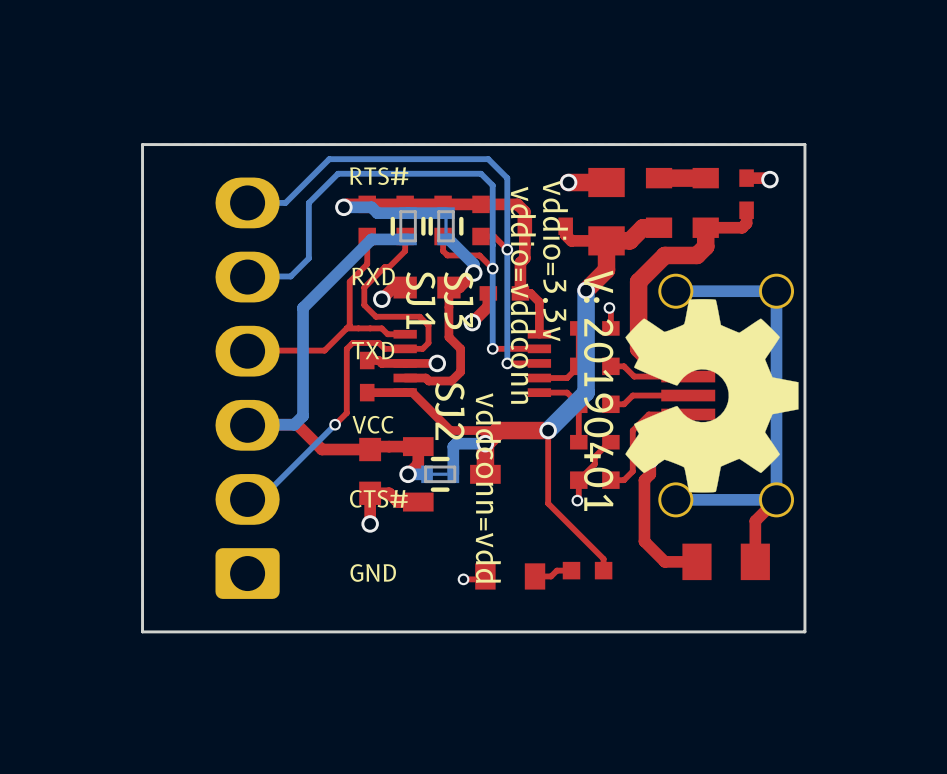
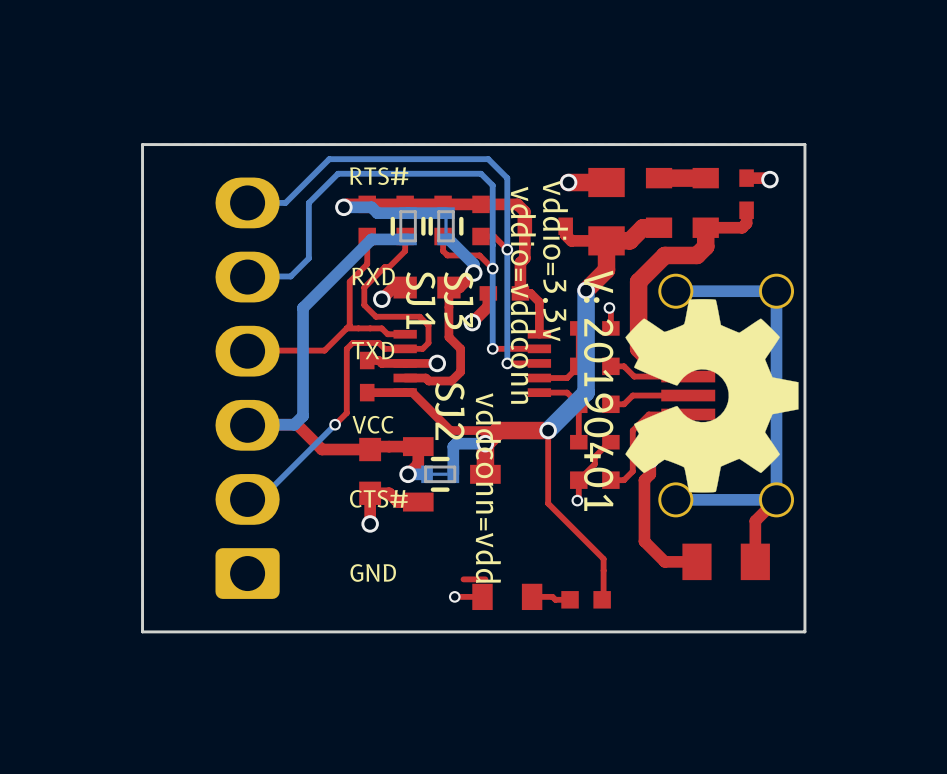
top track: (571, 570) (556, 570) (551, 576) (535, 576) -> none
part position: (587, 570) -> (586, 599)
top track: none -> (603, 570) (603, 596) (600, 599)
part position: (510, 576) -> (507, 596)
via position: (463, 579) -> (454, 596)
top track: none -> (482, 596) (454, 596)
top track: none -> (533, 596) (552, 596) (555, 599) (570, 599)

